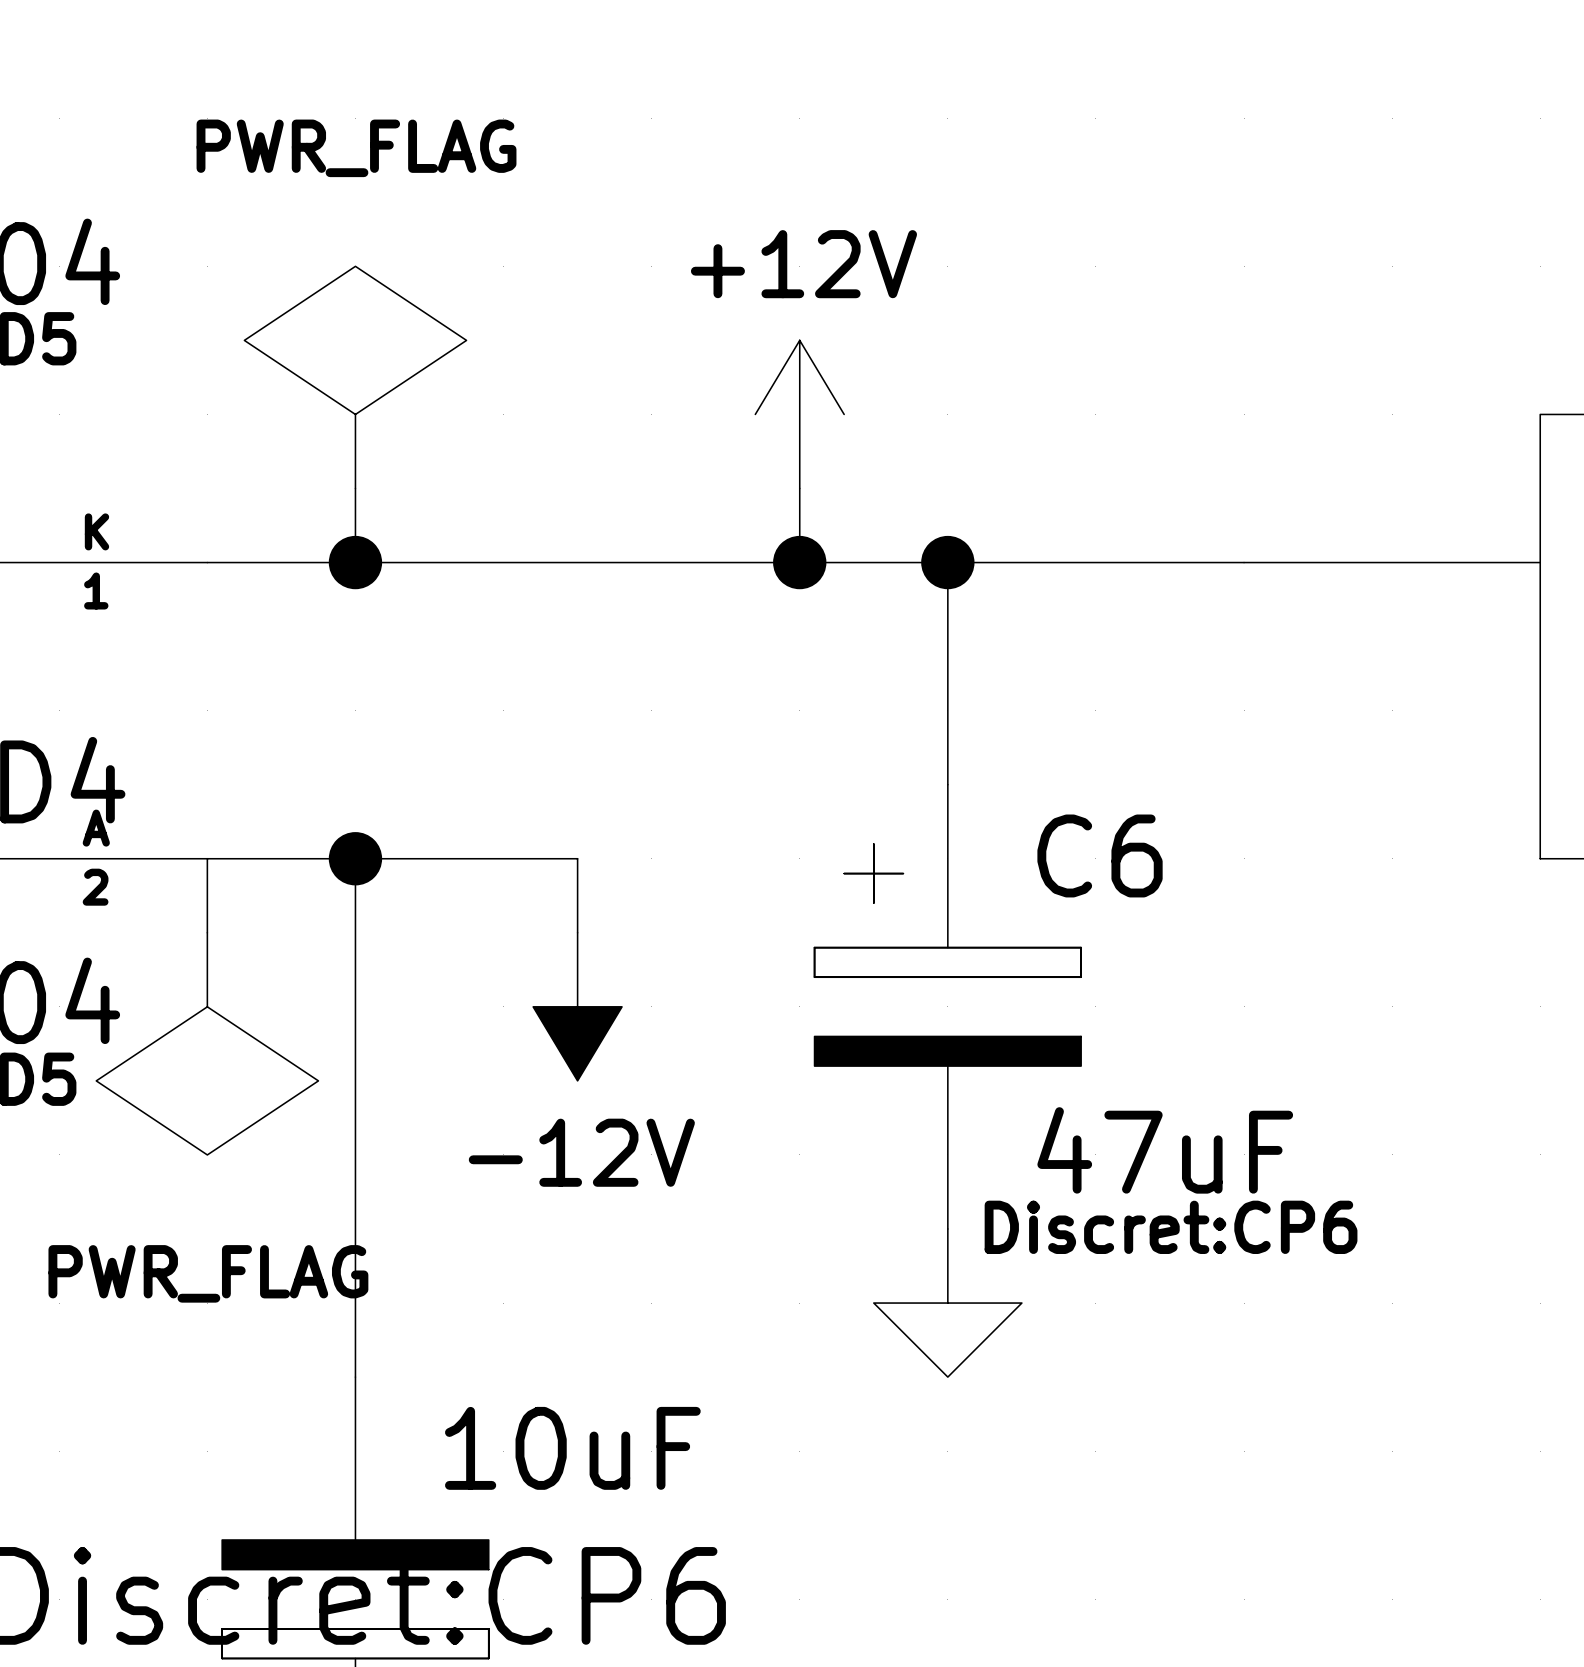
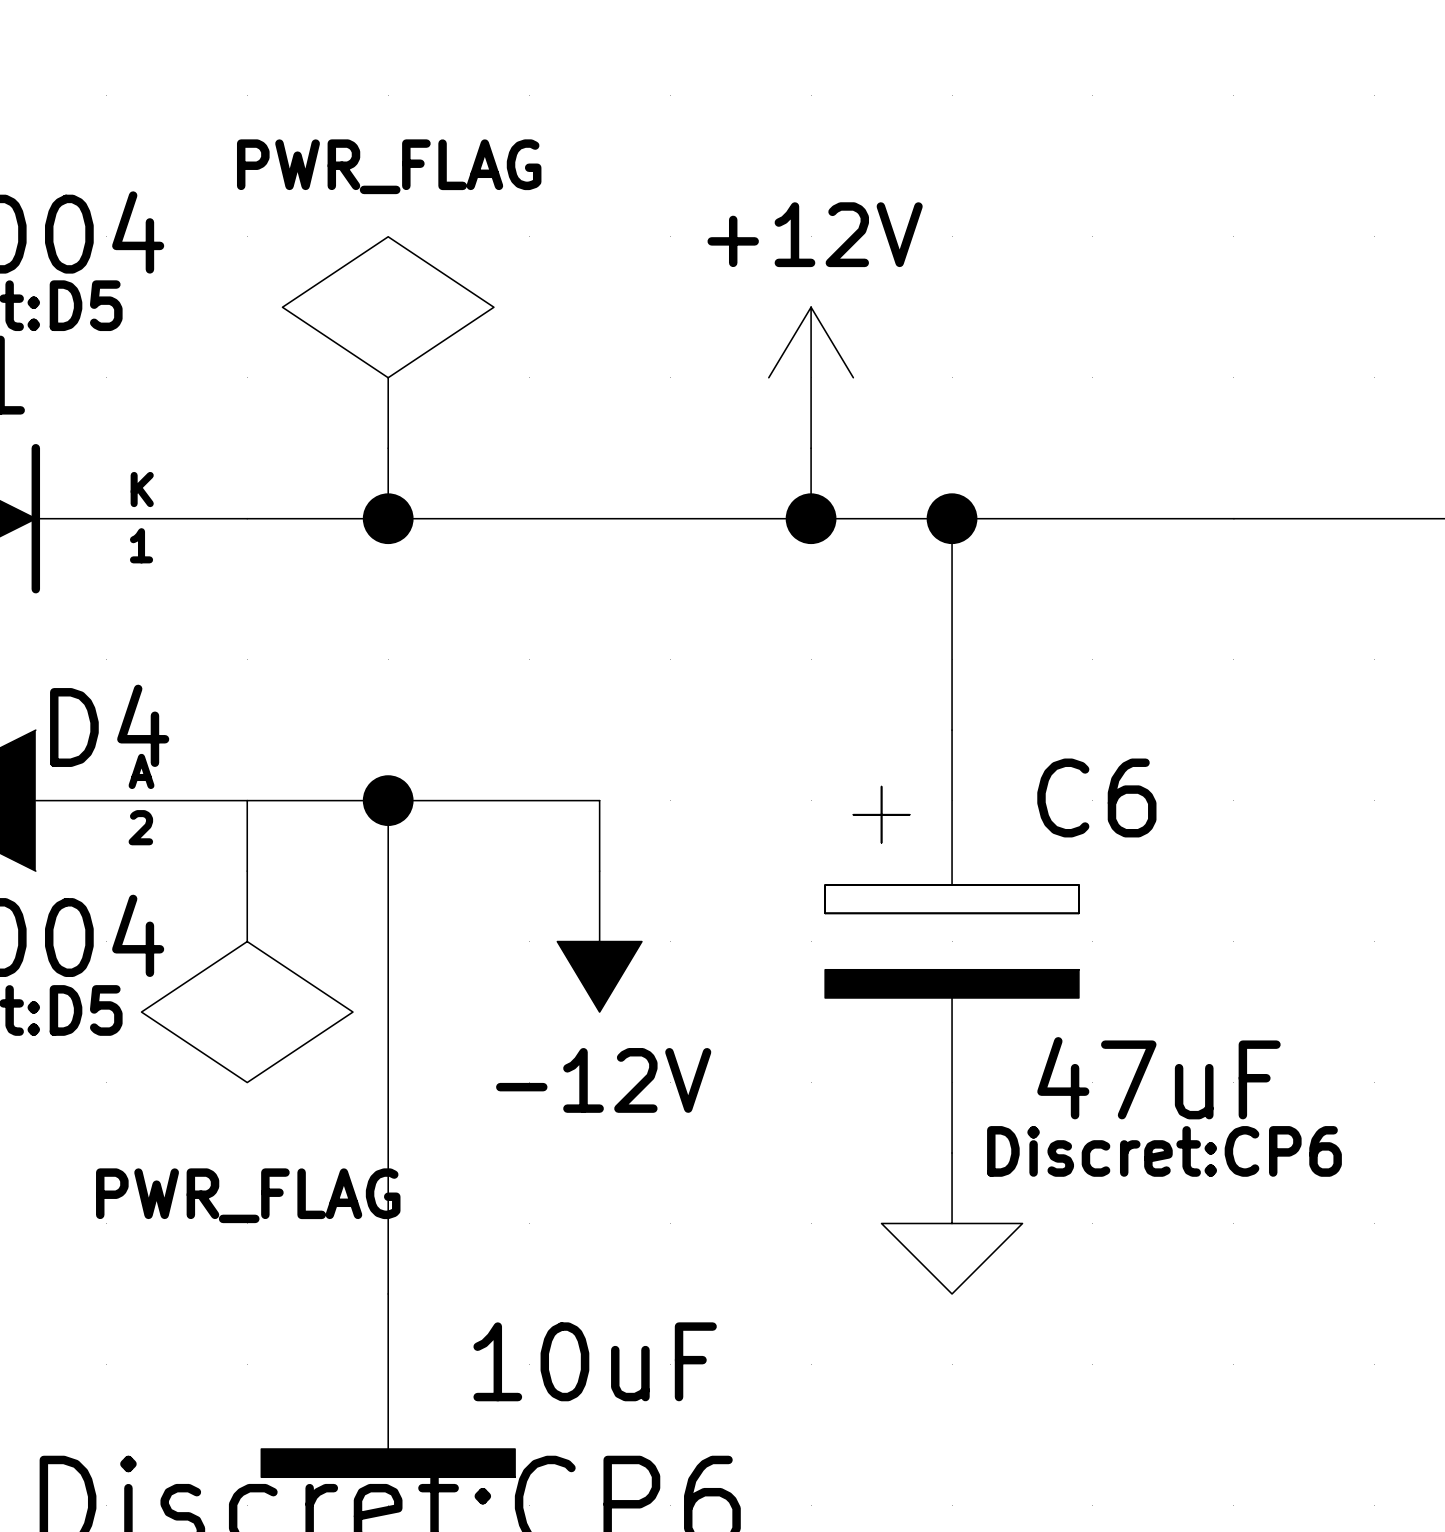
power symbol text position: PWR_FLAG (356, 148) -> PWR_FLAG (389, 166)

